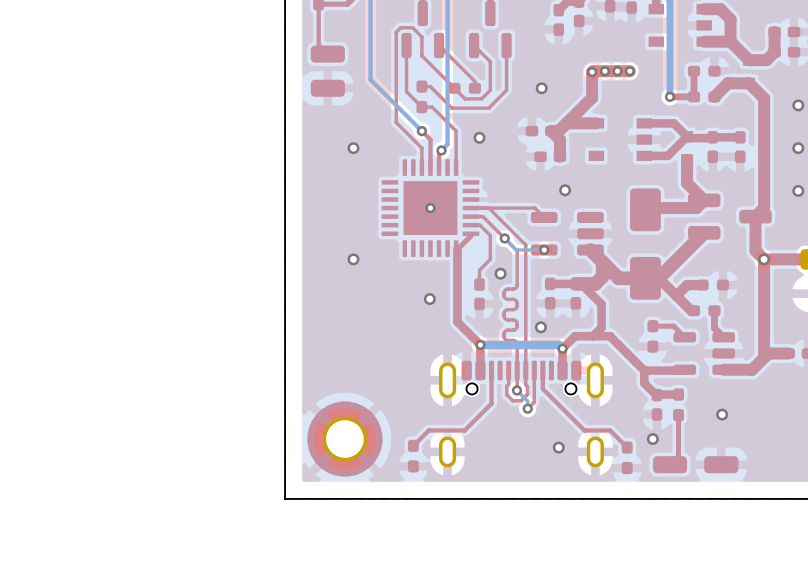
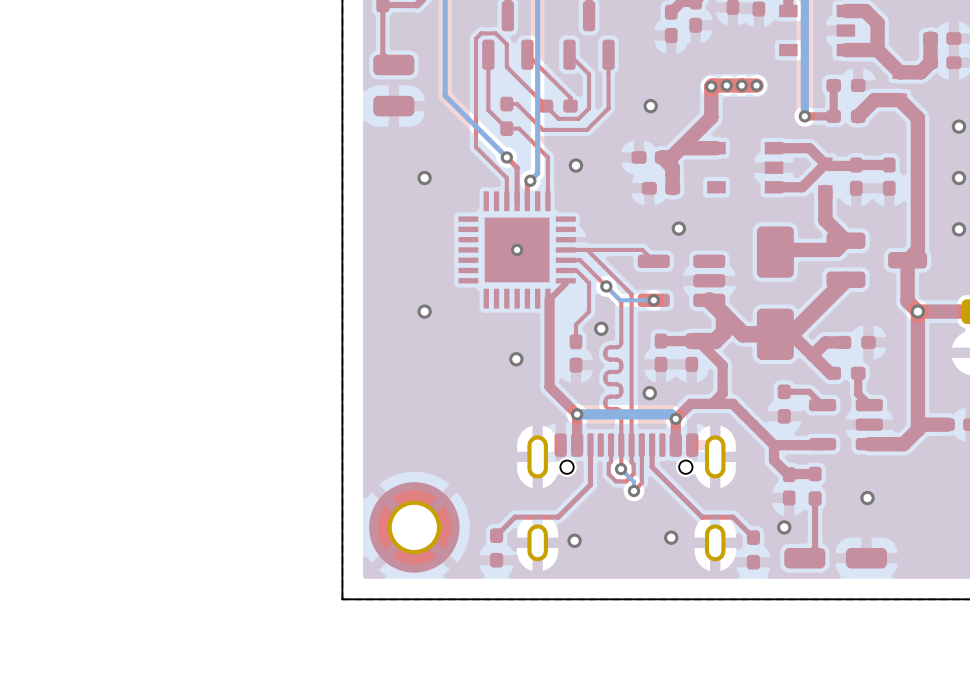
via: none -> (574, 540)

